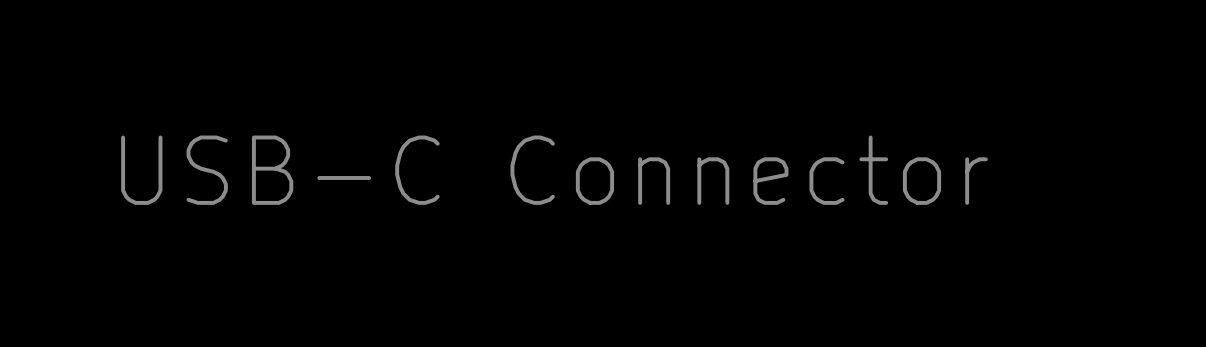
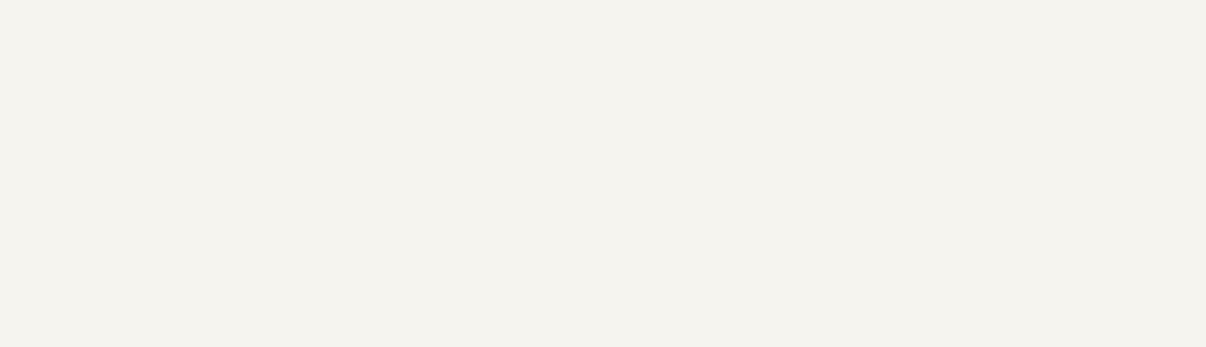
text: USB-C Connector (554, 170) -> none

